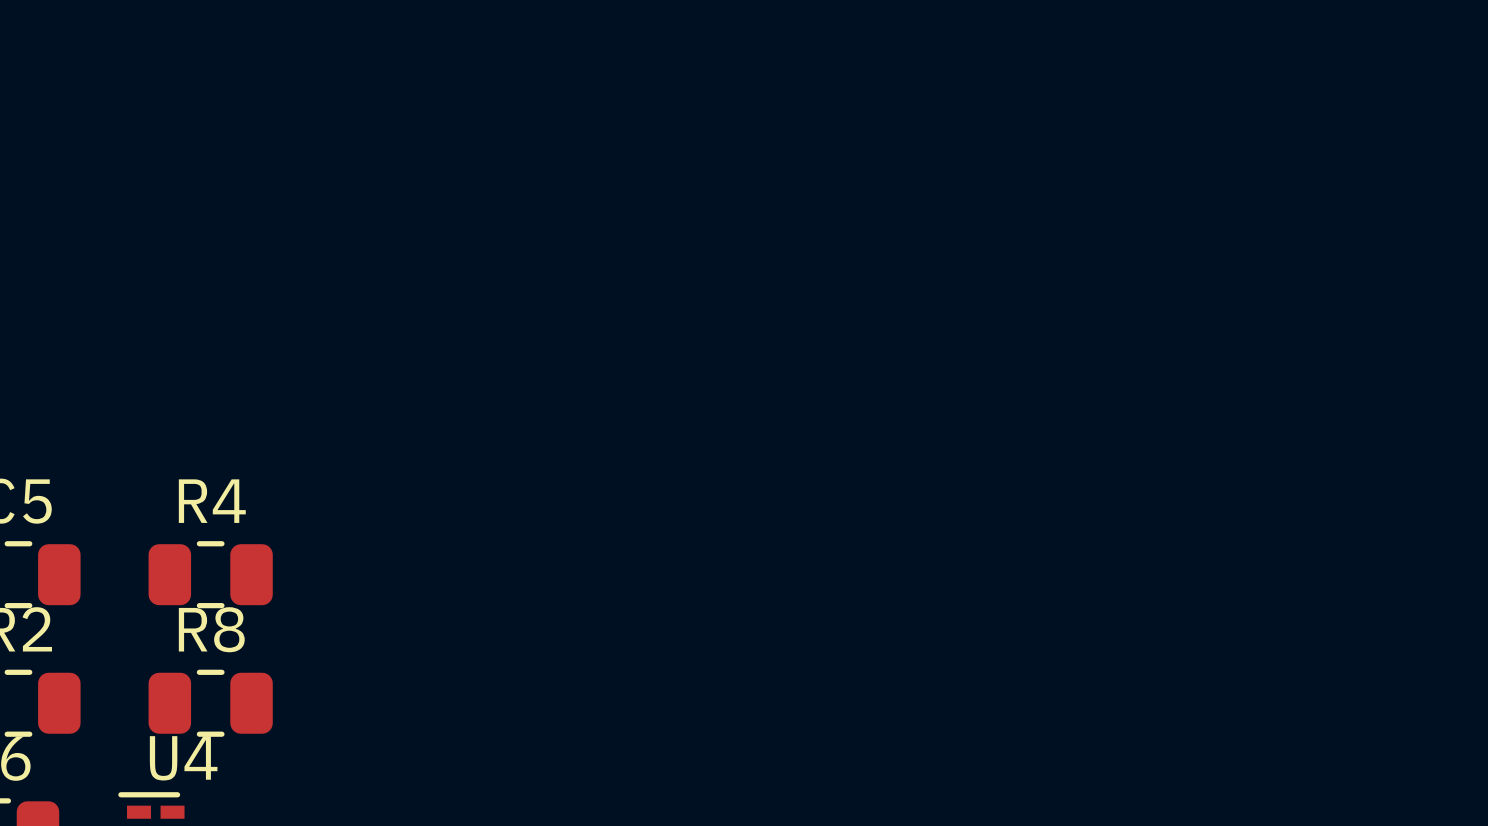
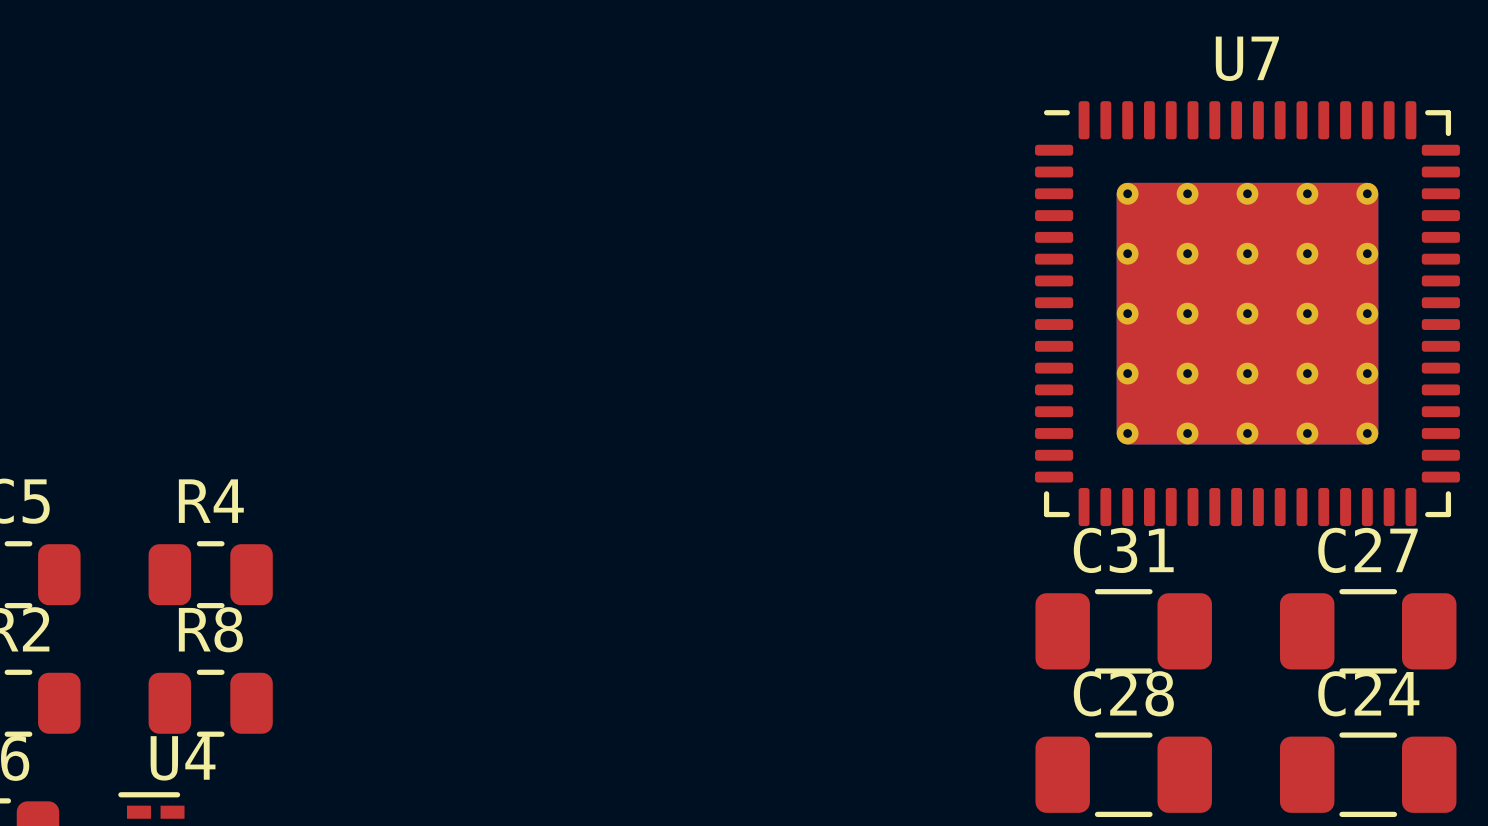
U7: none -> (1247, 313)
C31: none -> (1123, 631)
C27: none -> (1368, 631)
C28: none -> (1123, 774)
C24: none -> (1368, 774)

